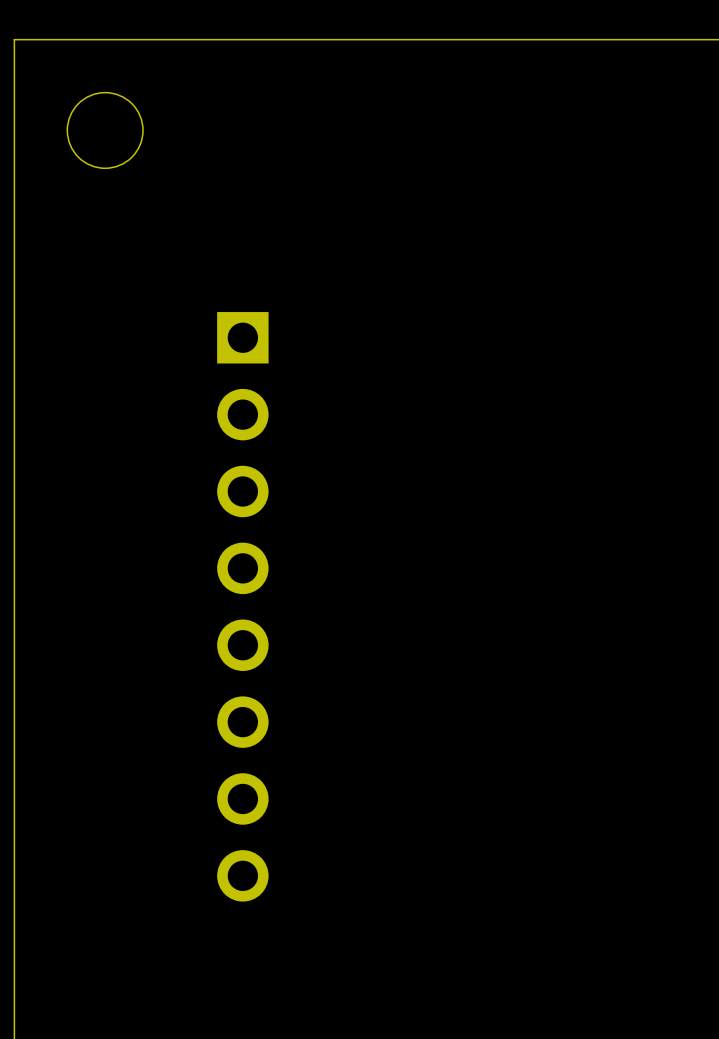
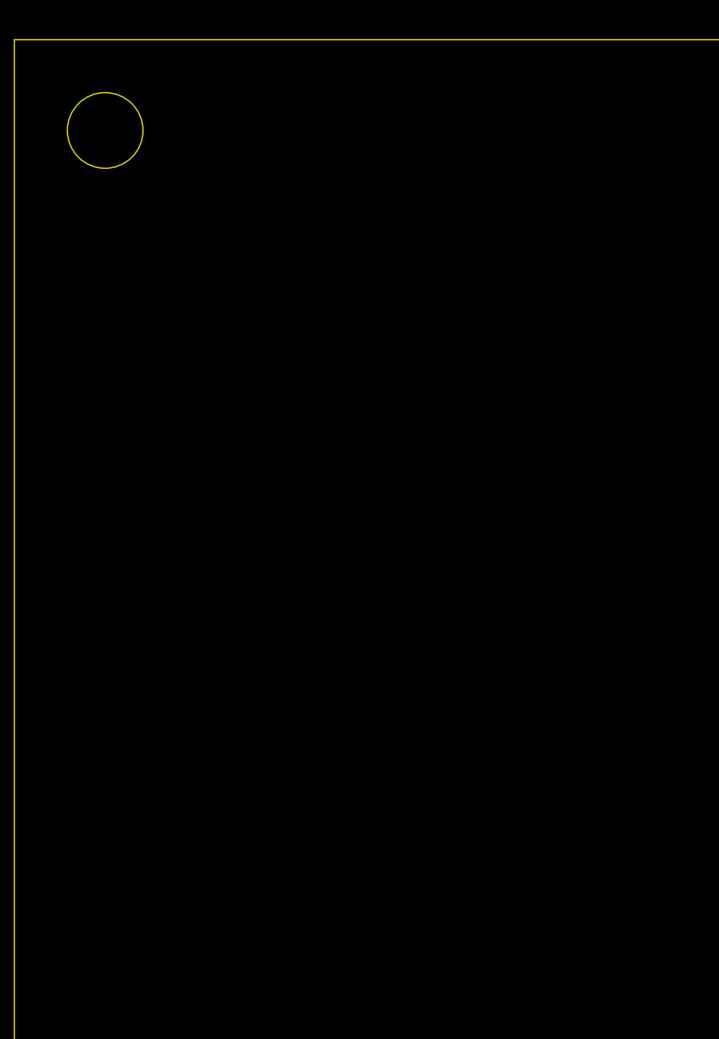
part: (242, 606) -> none

